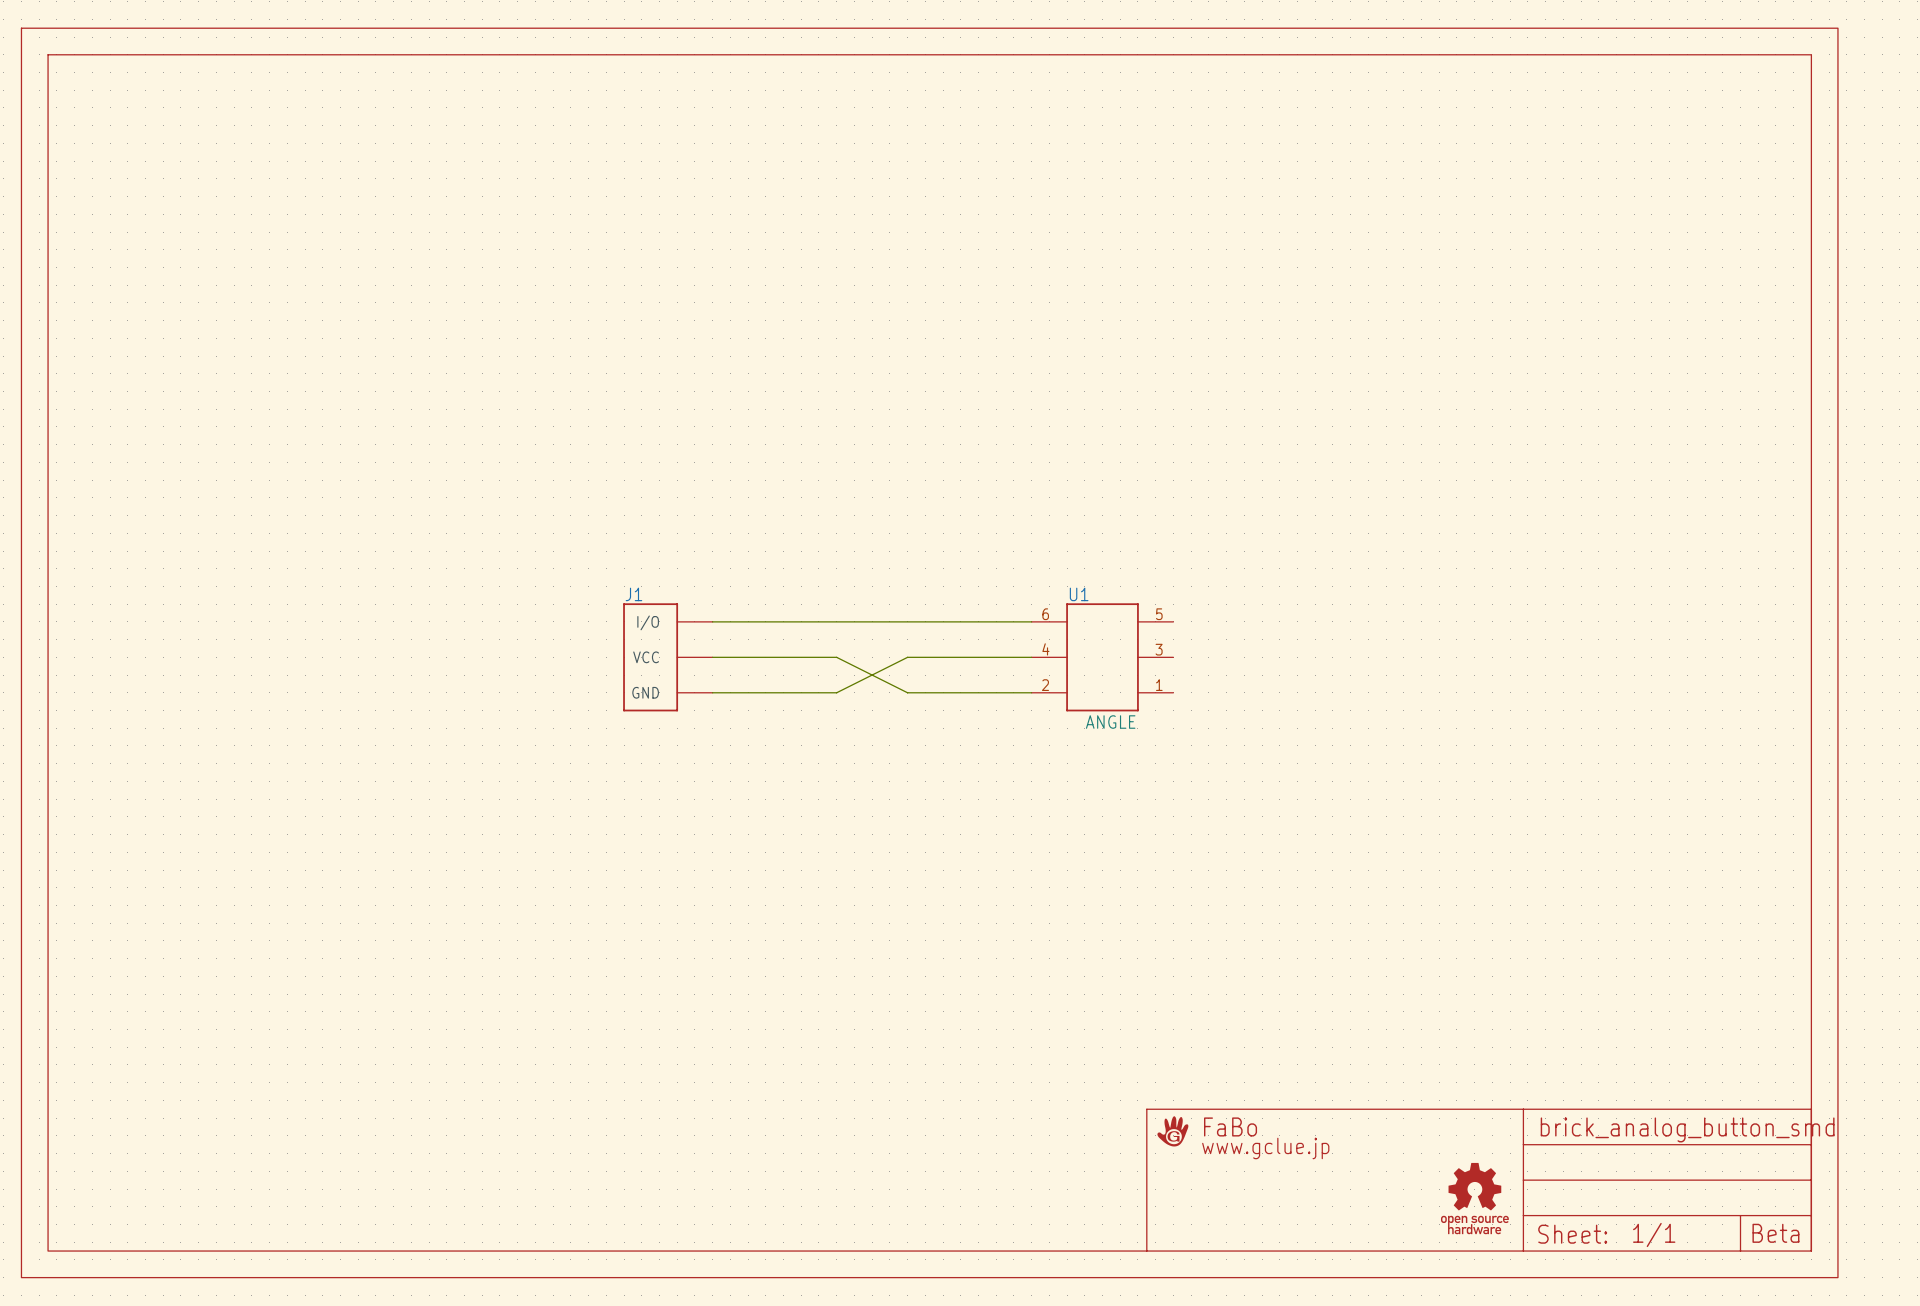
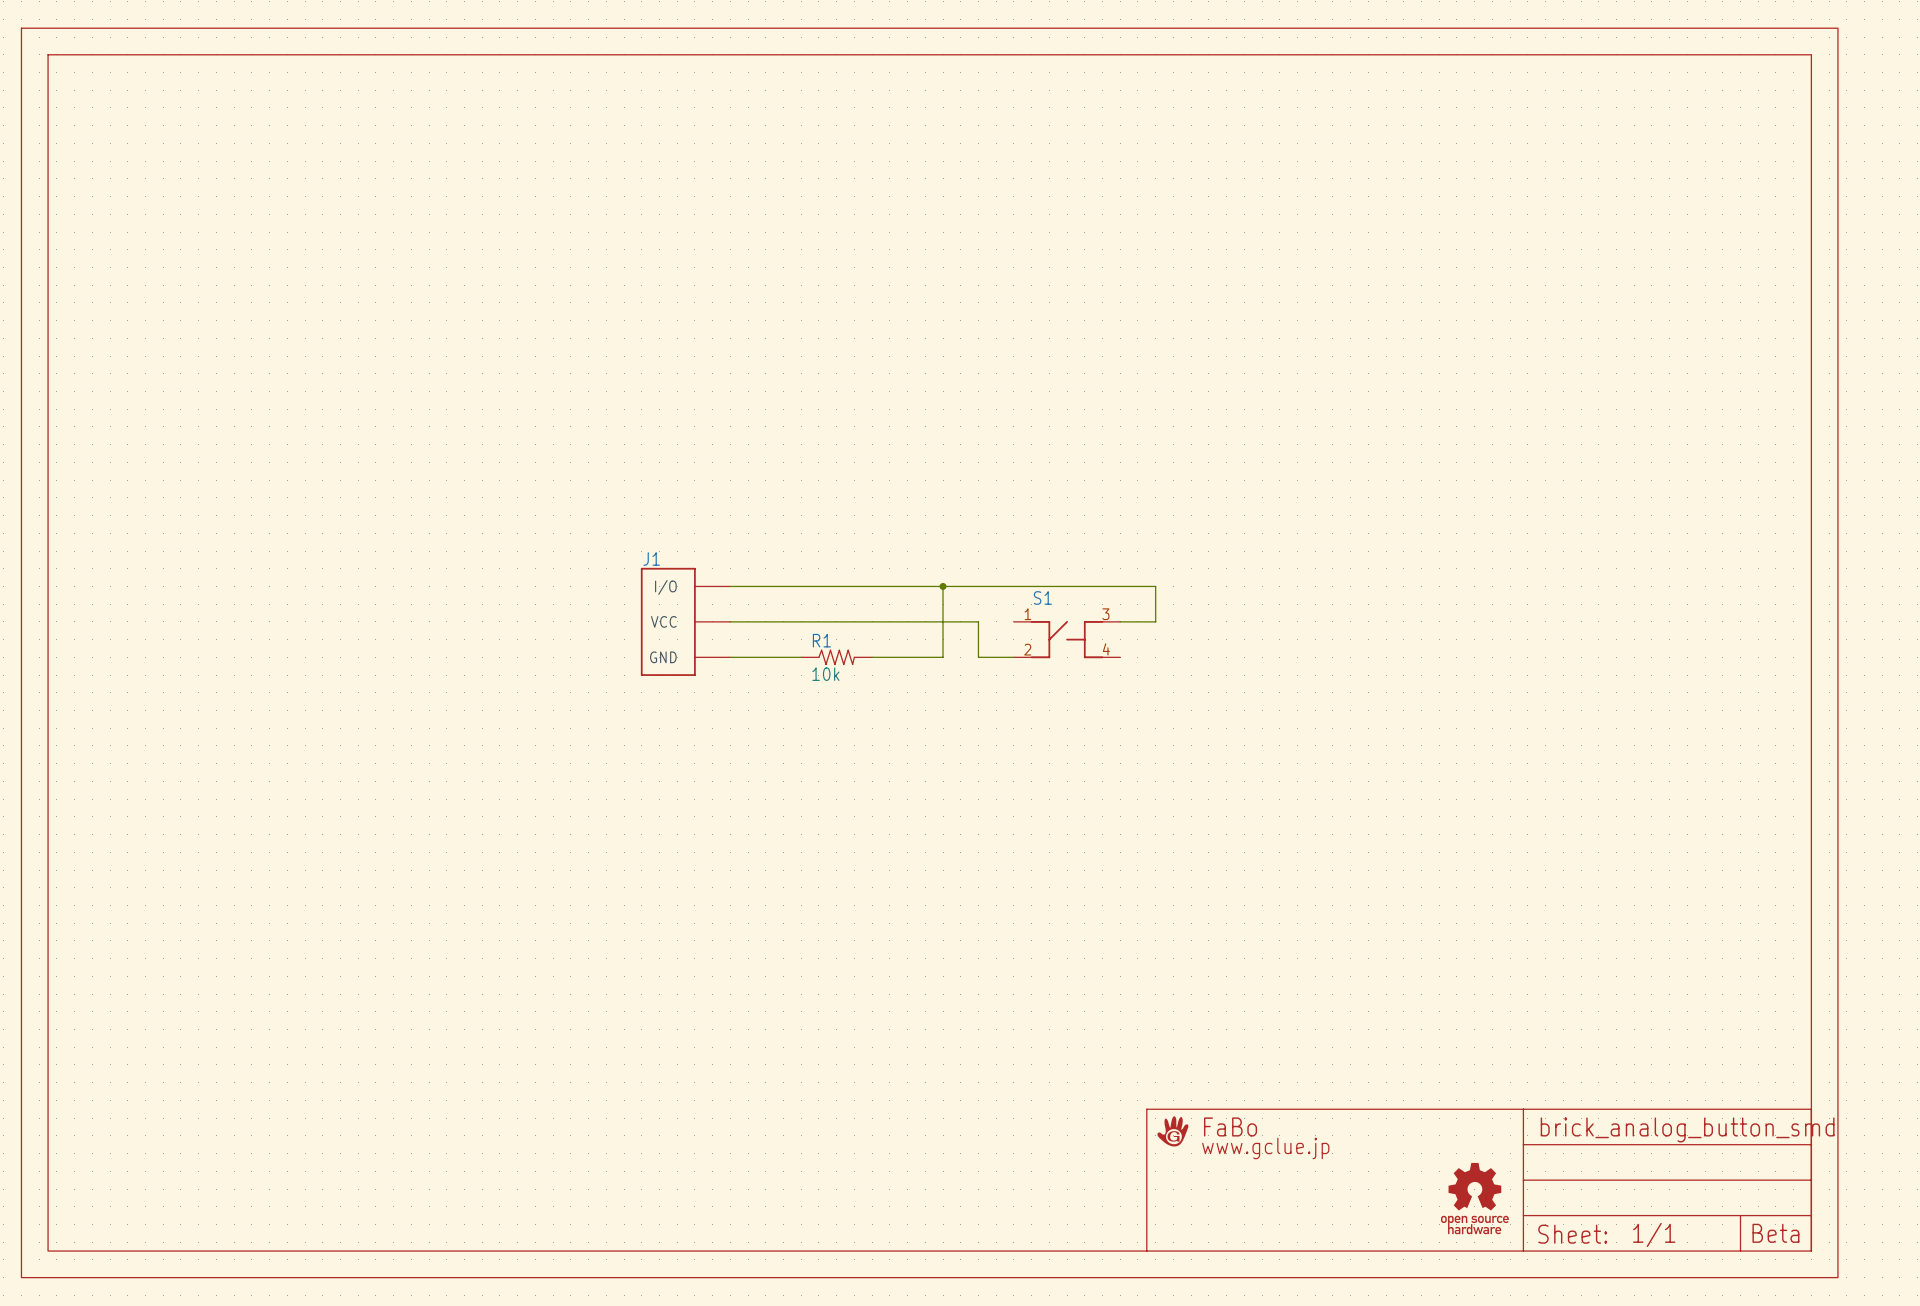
wire: none -> (730, 586) (1155, 586) (1155, 621) (1120, 621)
wire: none -> (943, 586) (943, 657)
junction: none -> (943, 586)
wire: (978, 621) (1031, 621) -> none
S1: none -> (1067, 639)
J1 position: (667, 657) -> (685, 621)
wire: (801, 657) (836, 657) (907, 692) (1031, 692) -> none
R1: none -> 10k (836, 657)
wire: (907, 657) (836, 692) (712, 692) -> (907, 657) (872, 657)
wire: (943, 657) (978, 657) -> (978, 621) (978, 657)
U1: ANGLE (1102, 657) -> none

